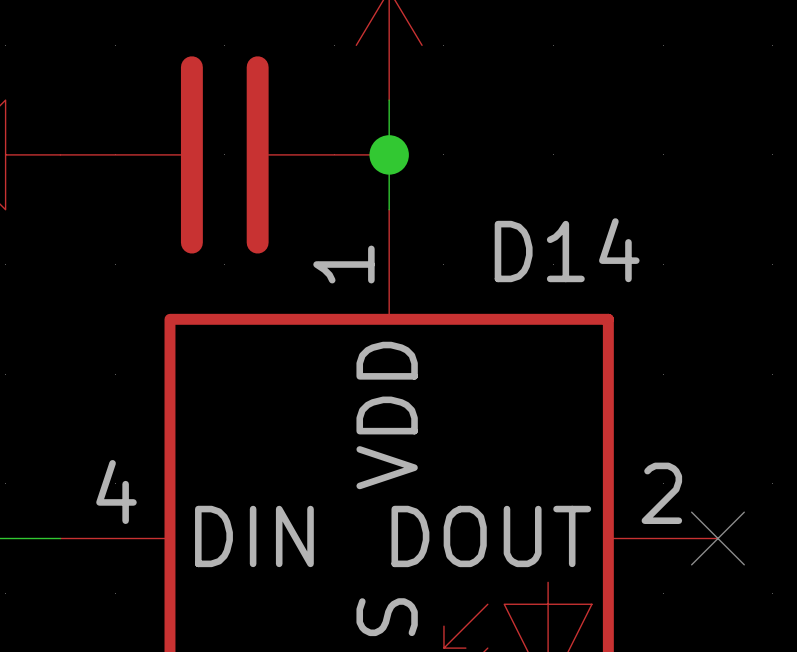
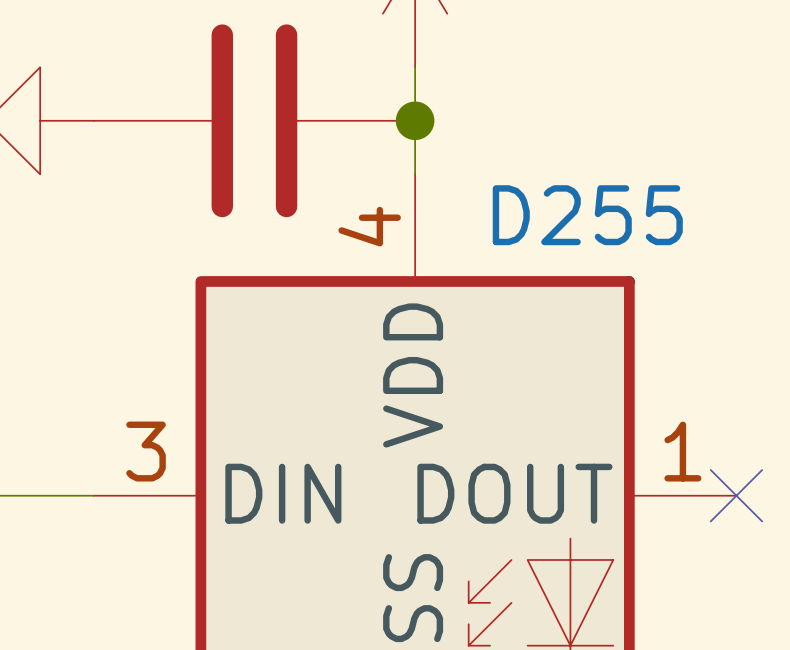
D14 name: D14 (567, 250) -> D255 (587, 215)
D14 pin number: 1 (343, 264) -> 4 (369, 226)
D14 pin number: 4 (116, 492) -> 3 (146, 451)
D14 pin number: 2 (661, 493) -> 1 (682, 451)

